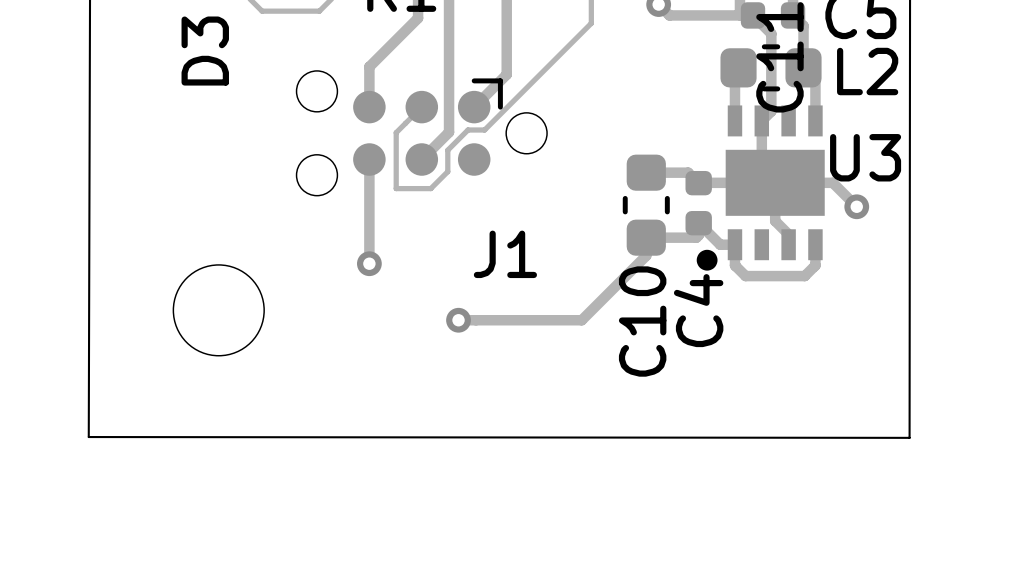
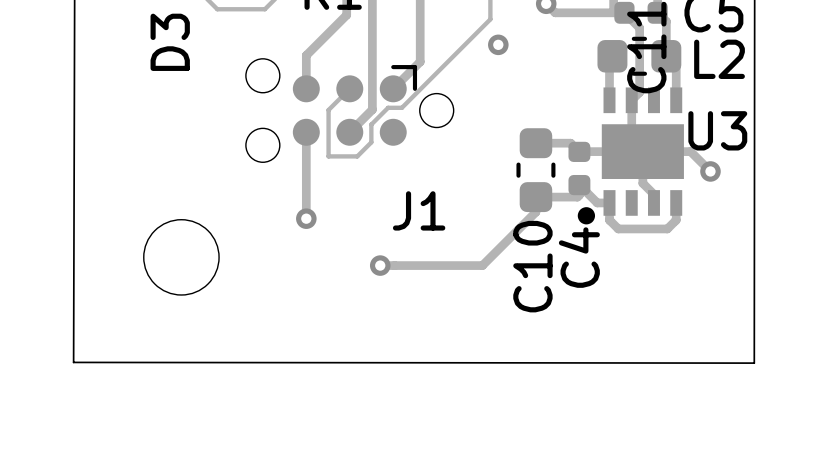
via: none -> (498, 44)

